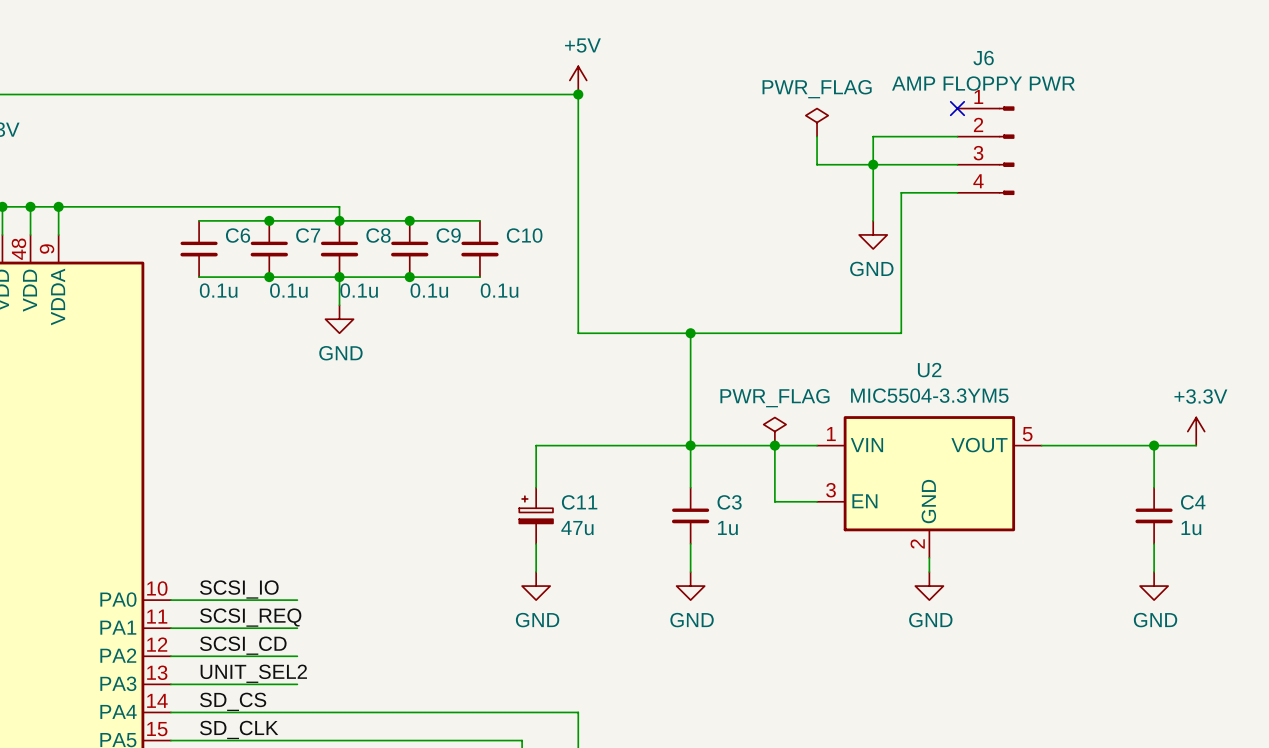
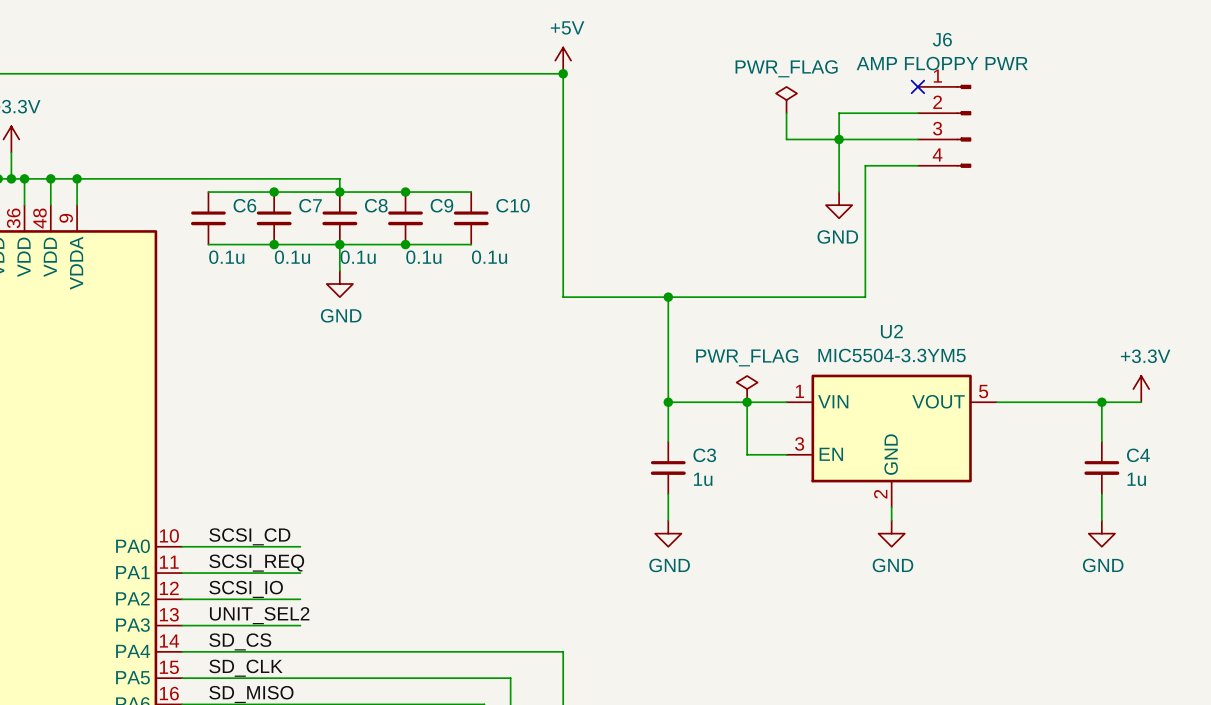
wire: (690, 445) (536, 445) (536, 487) -> none
C11: 47u (536, 515) -> none
wire: (536, 543) (536, 572) -> none
power symbol: GND (536, 586) -> none
label: SCSI_IO (239, 589) -> SCSI_CD (249, 536)
label: SCSI_CD (243, 645) -> SCSI_IO (246, 589)

